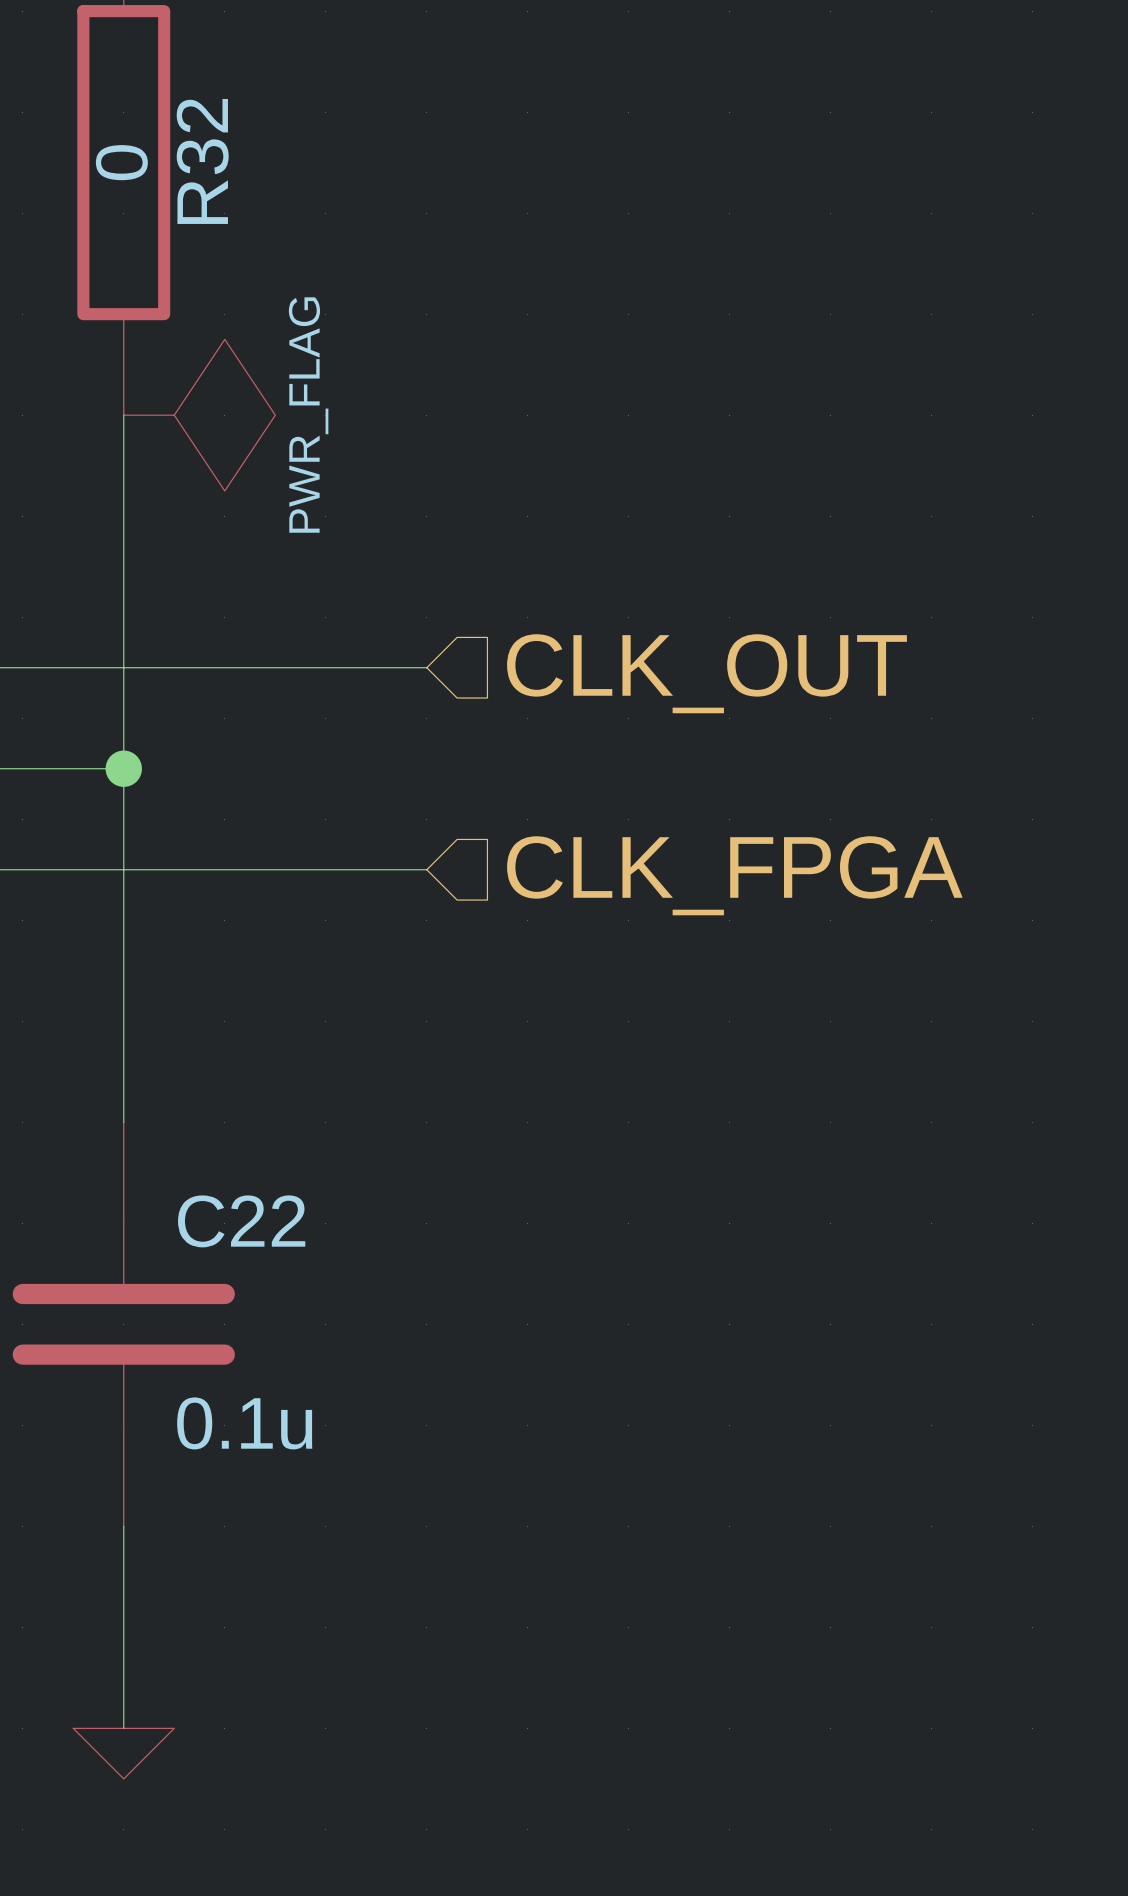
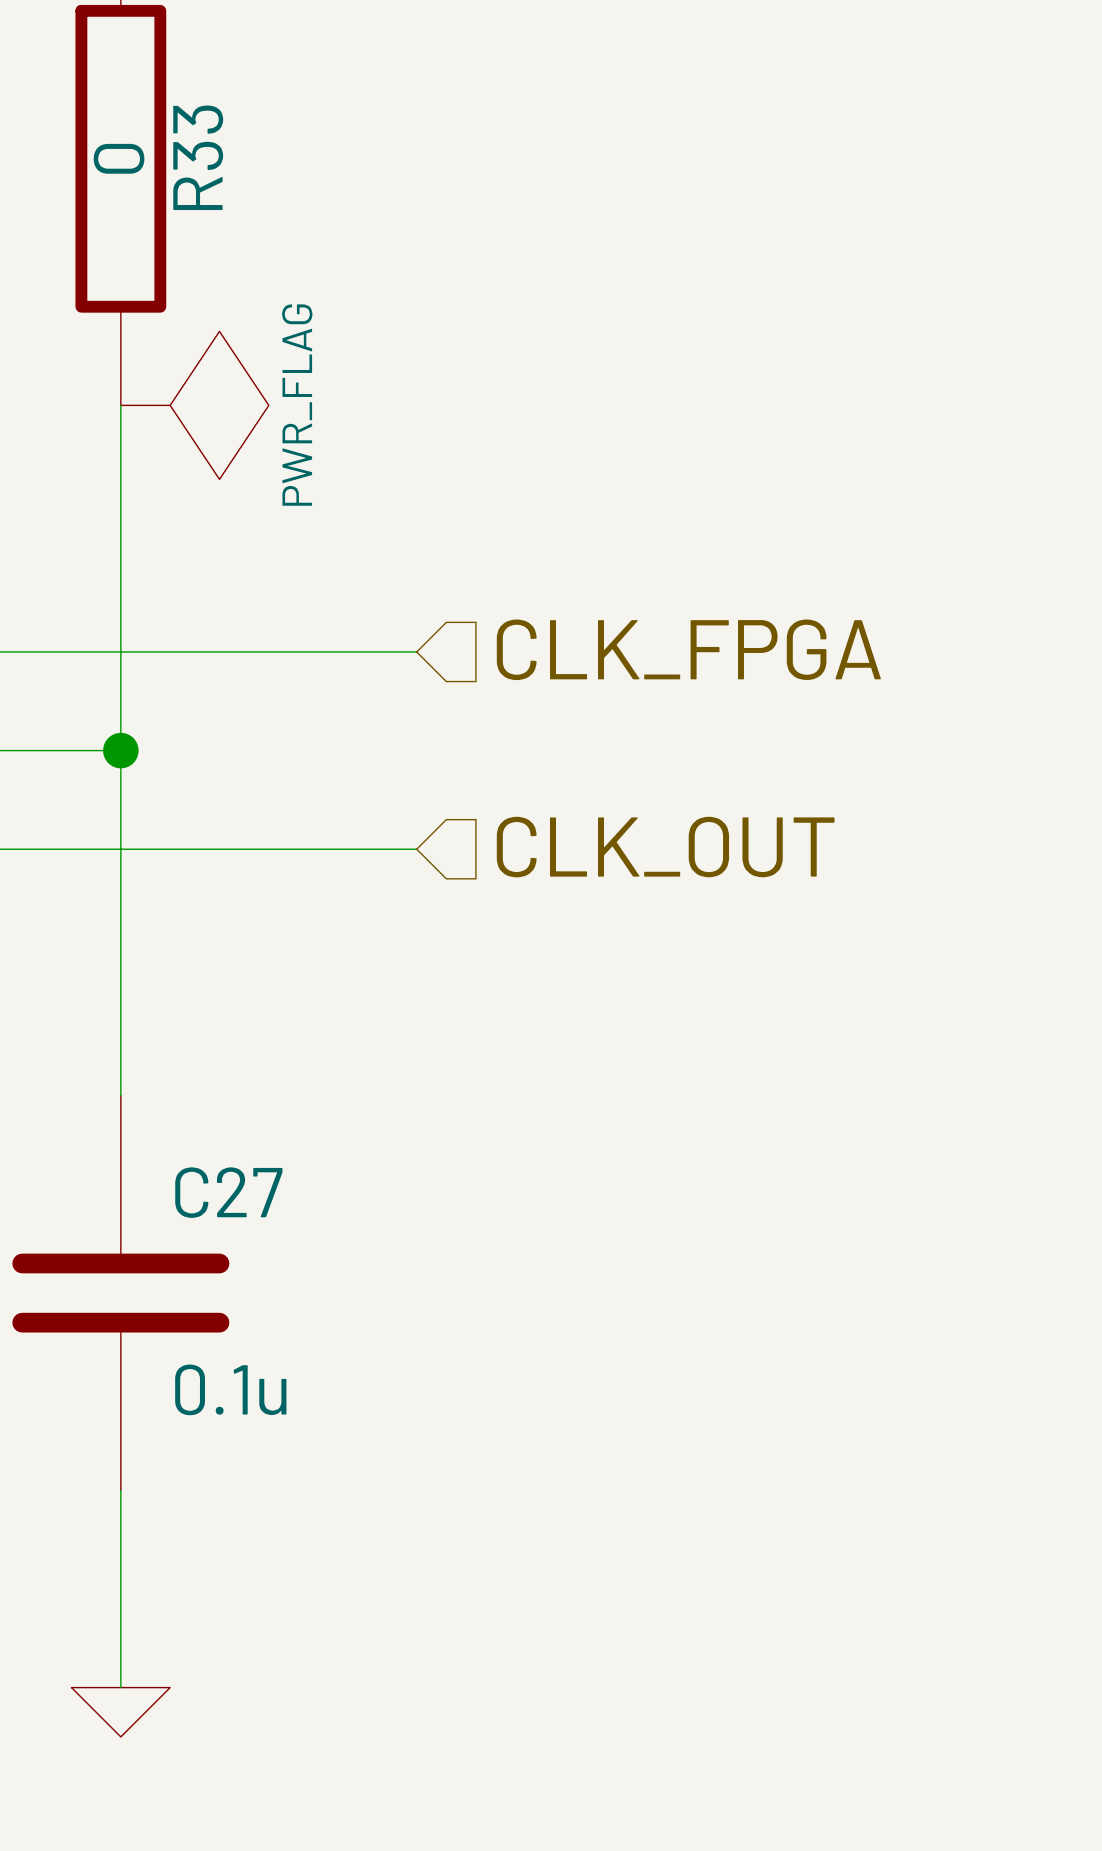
R32 name: R32 (202, 161) -> R33 (198, 157)
hierarchical label: CLK_OUT (706, 673) -> CLK_FPGA (688, 649)
hierarchical label: CLK_FPGA (734, 875) -> CLK_OUT (665, 847)
C22 name: C22 (241, 1221) -> C27 (228, 1192)

